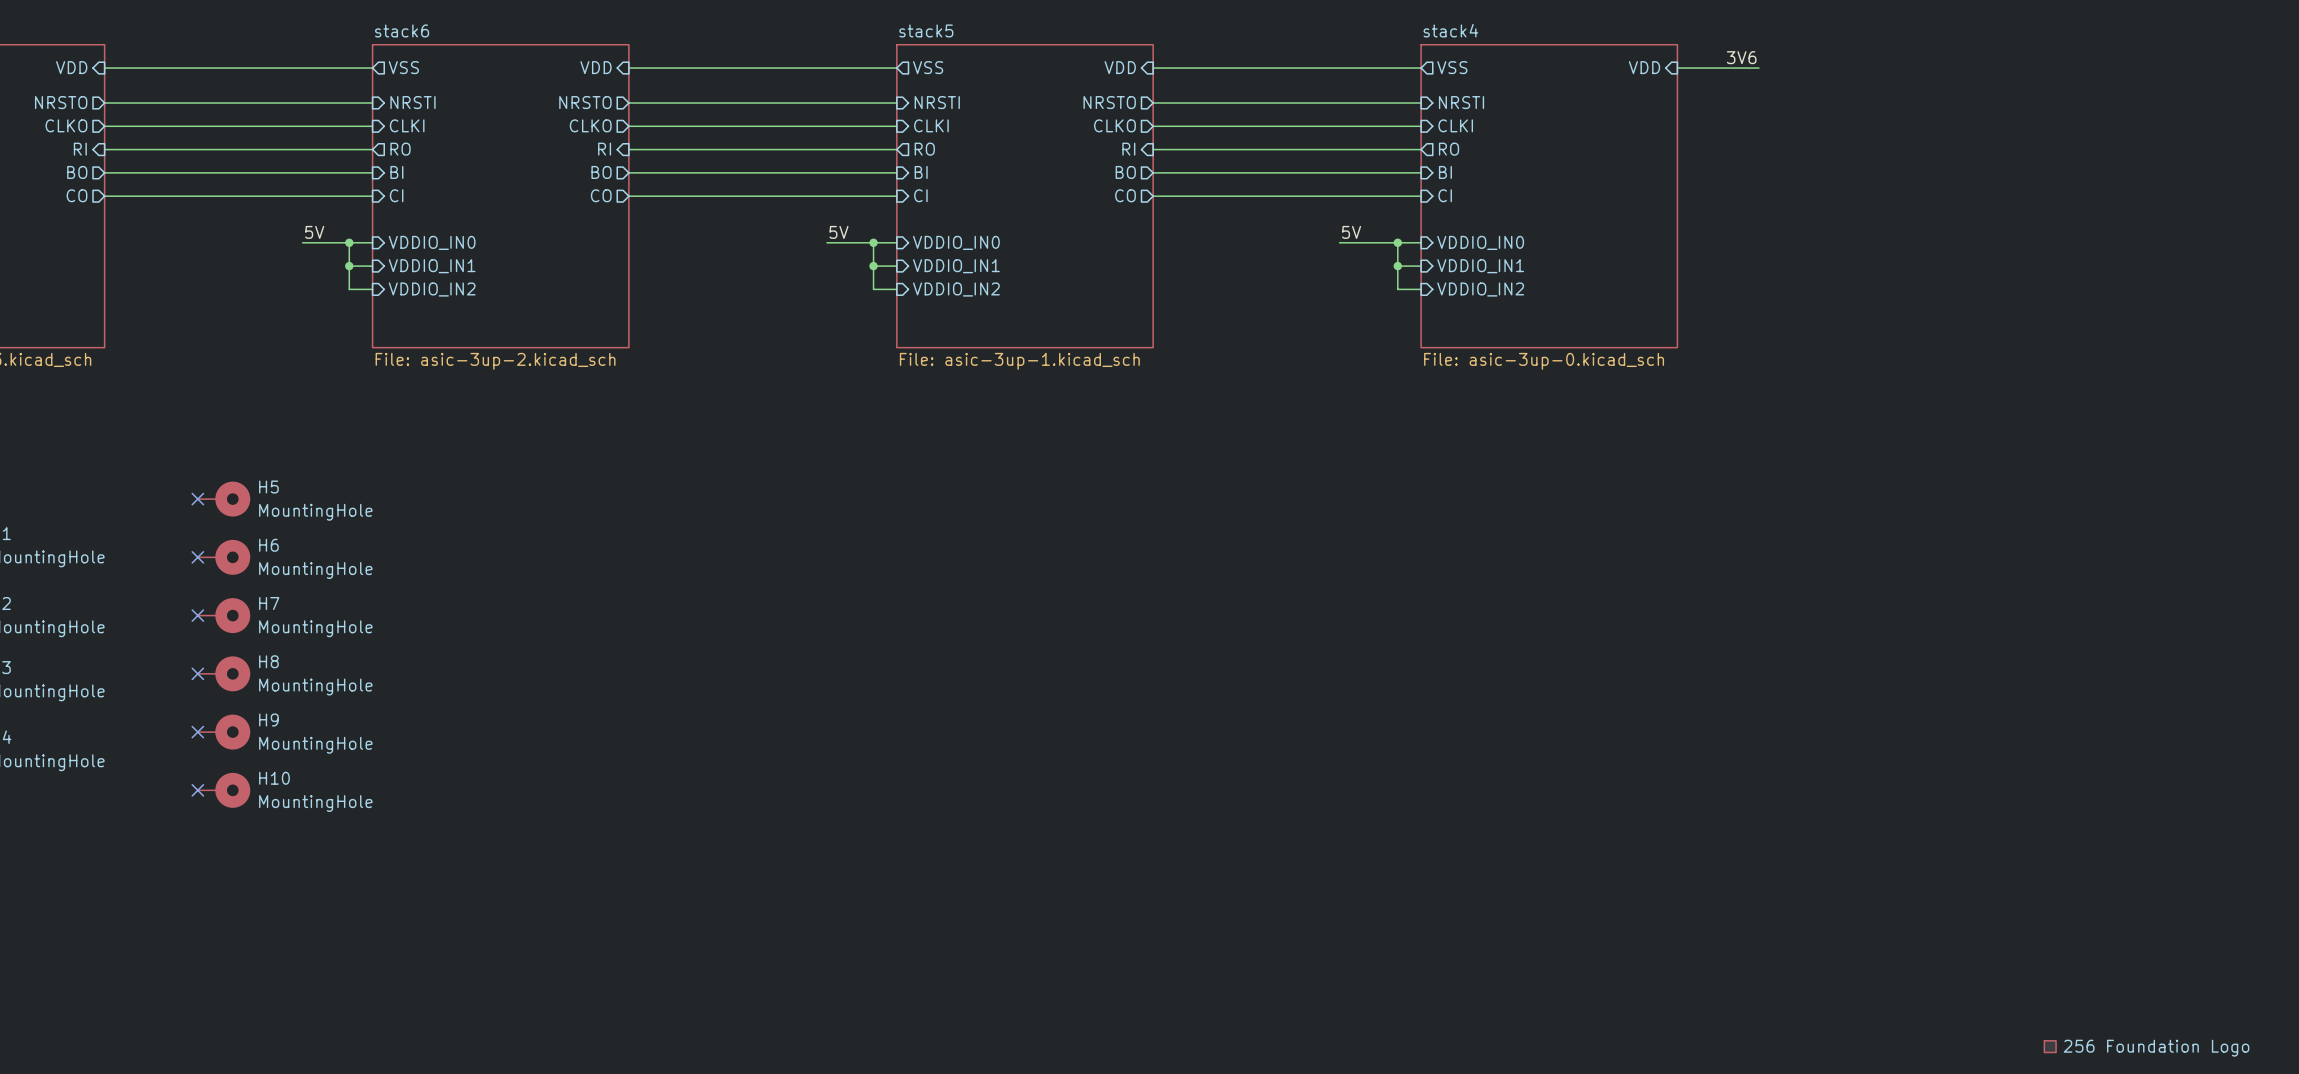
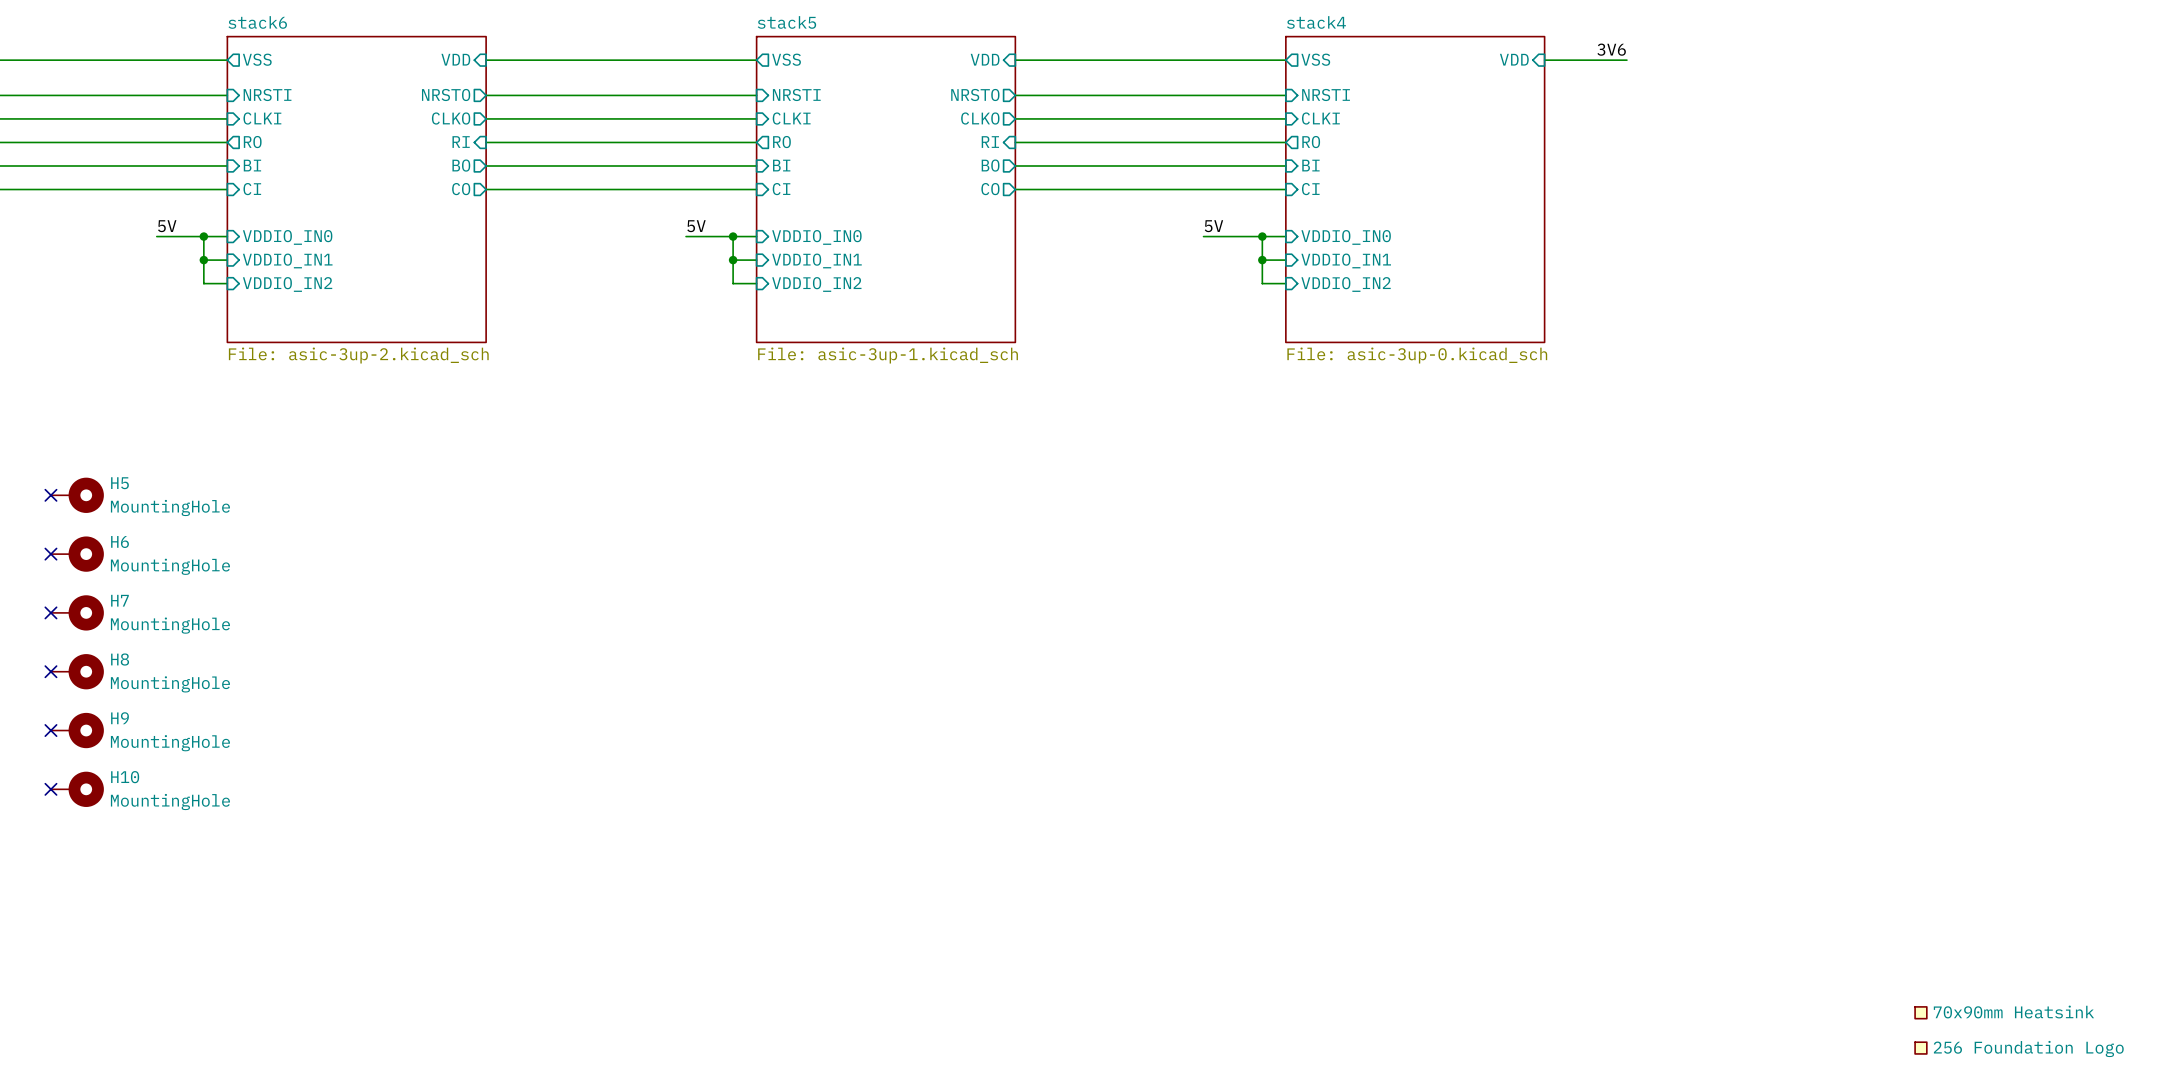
part: none -> 70x90mm Heatsink (1920, 1012)

